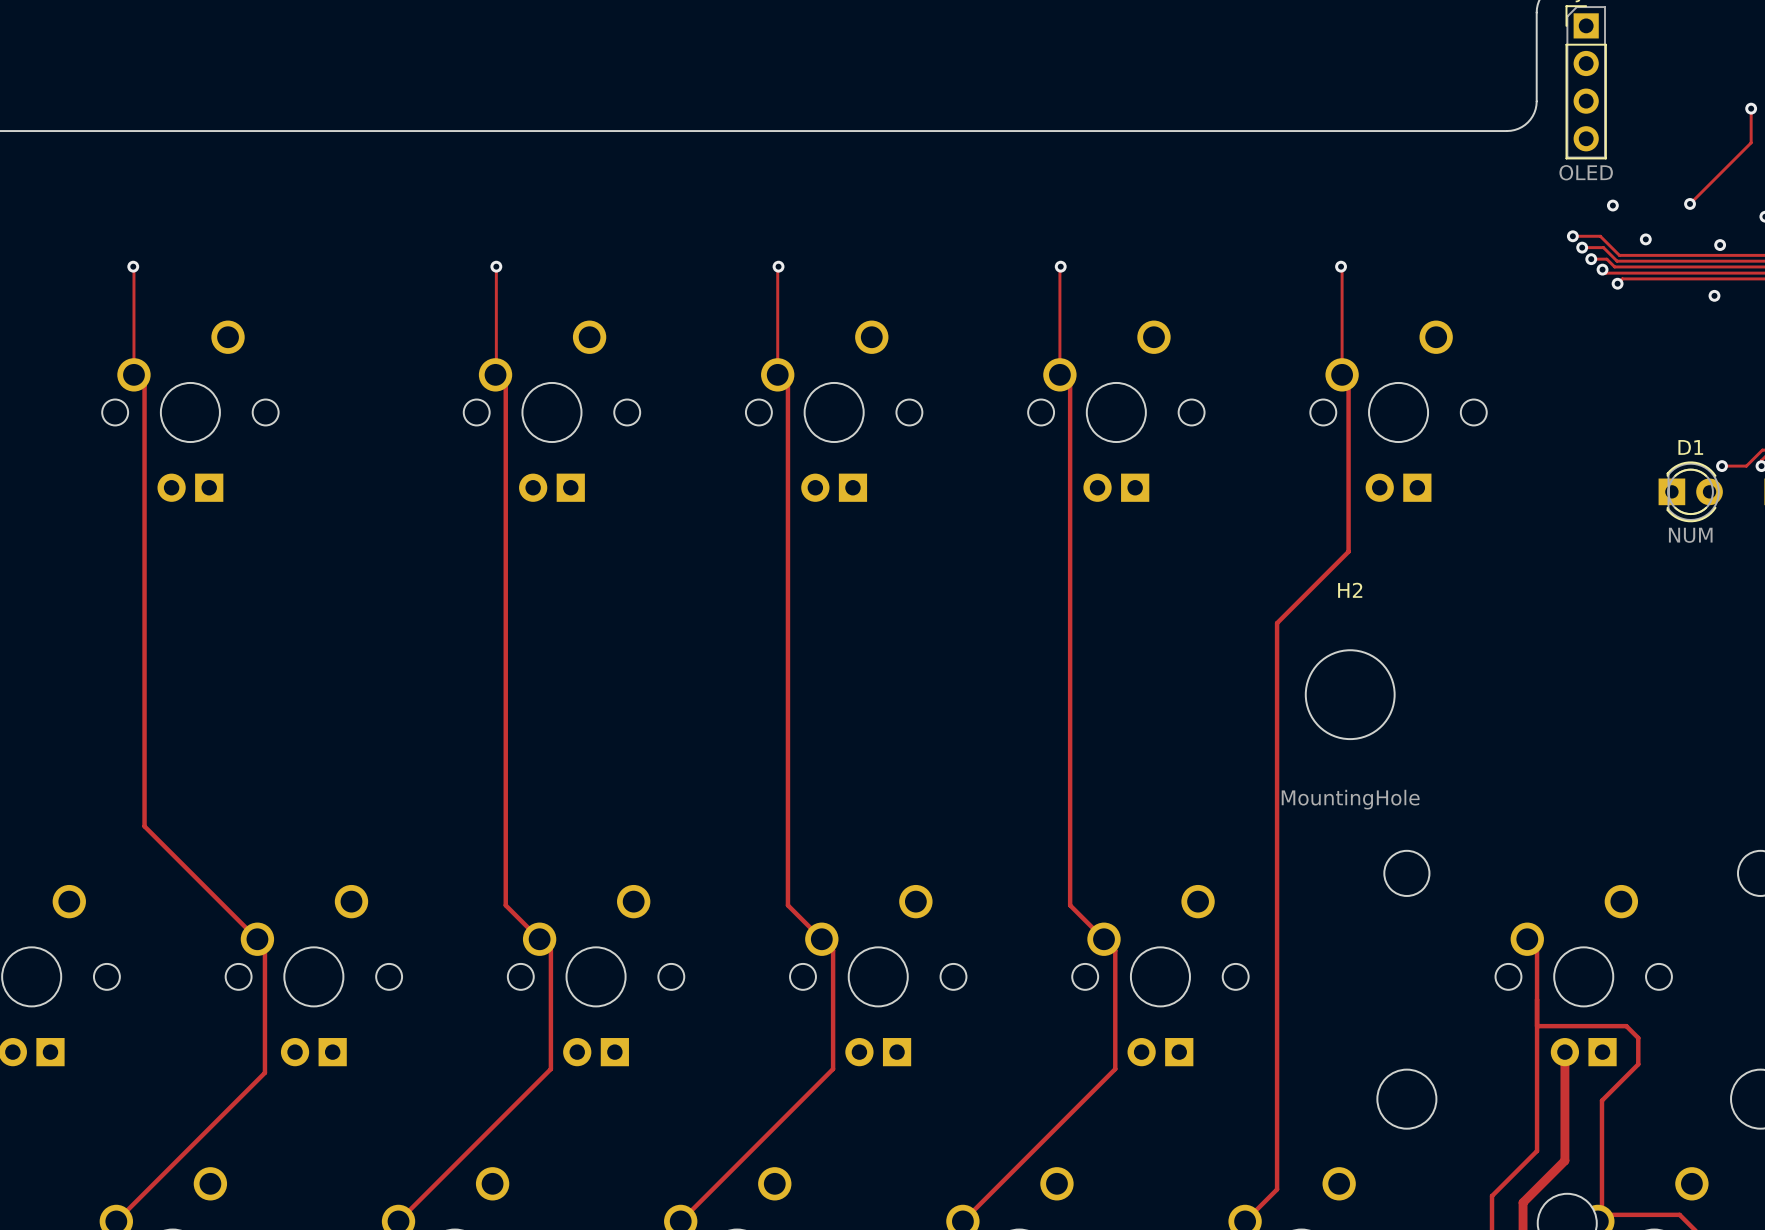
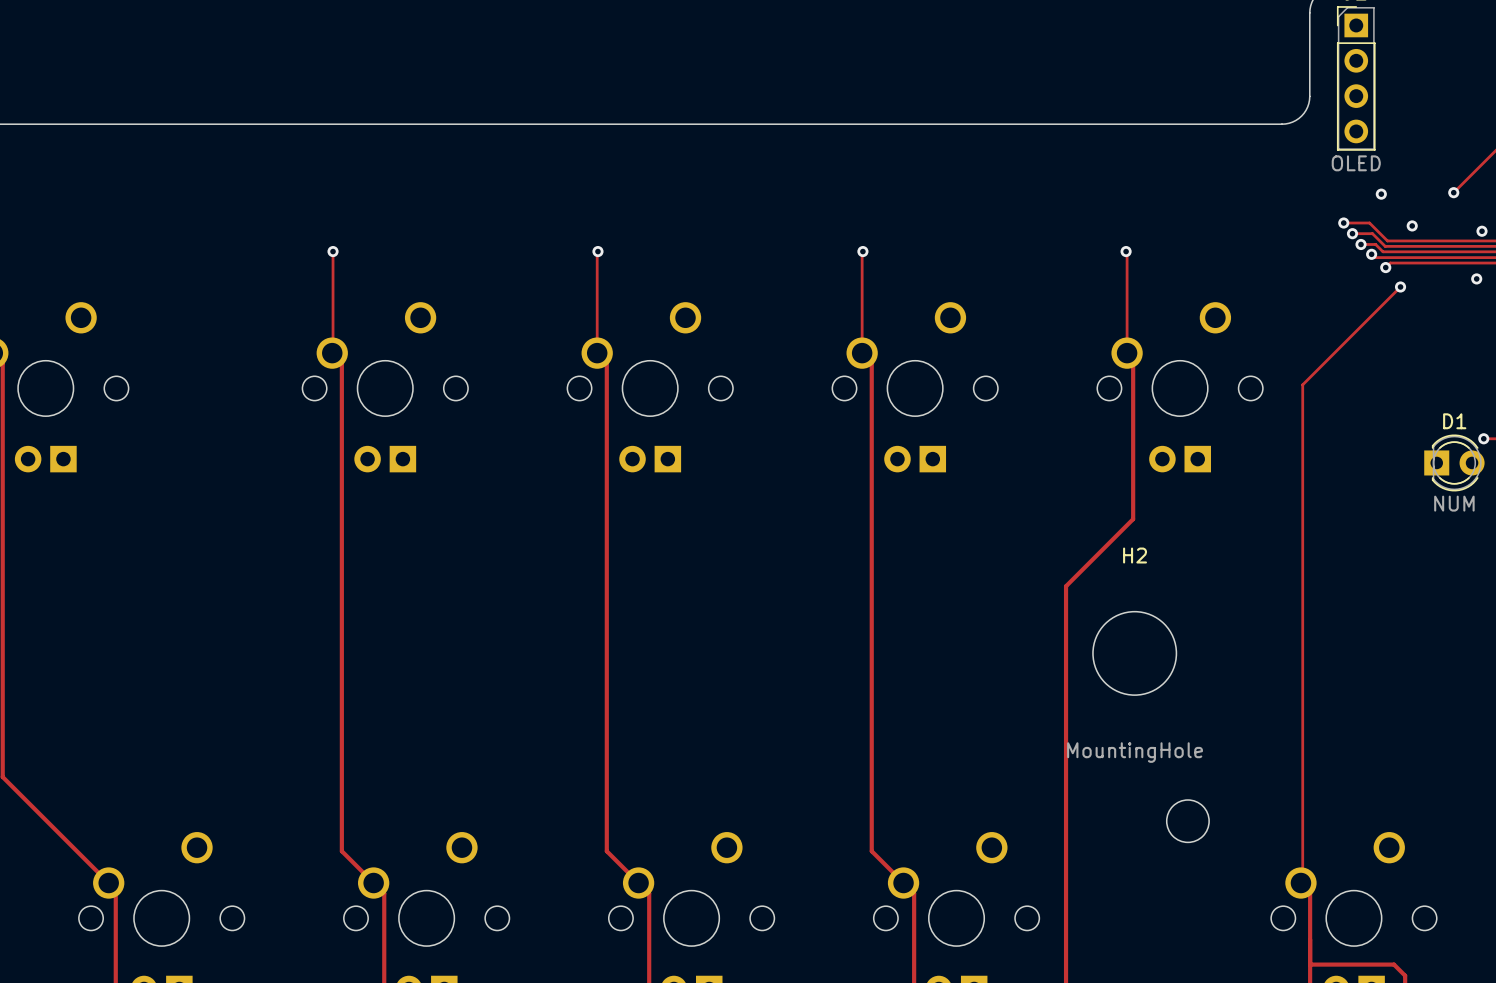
track: none -> (1400, 286) (1302, 384) (1302, 881) (1300, 883)
via: none -> (1400, 286)

